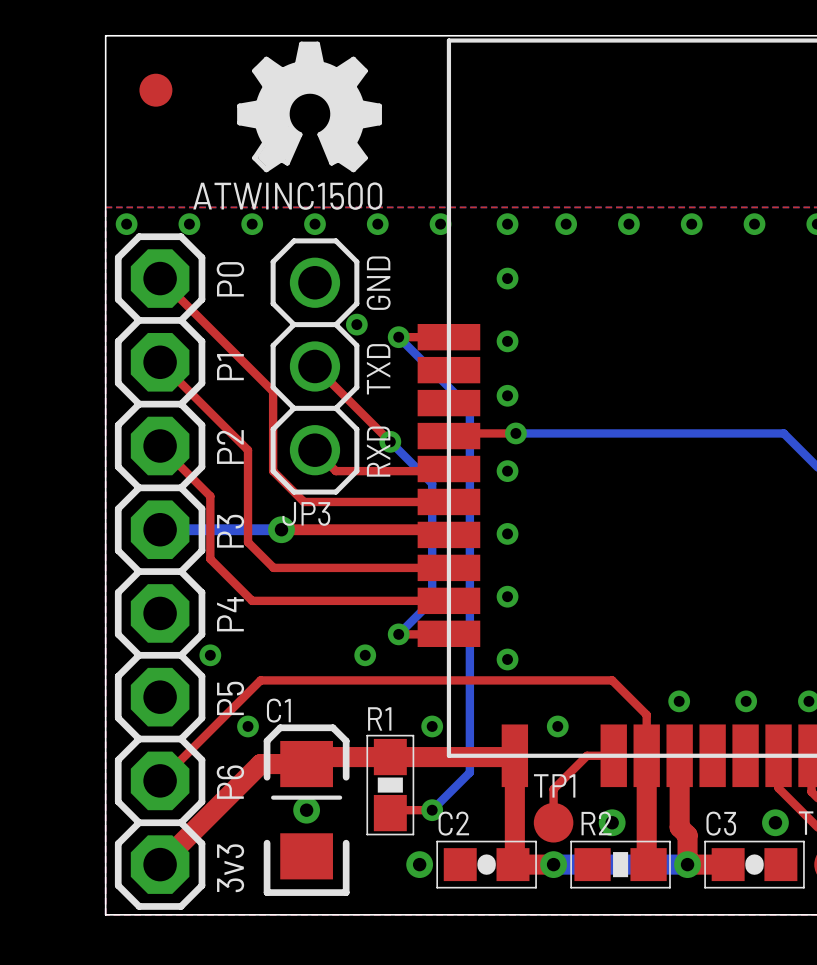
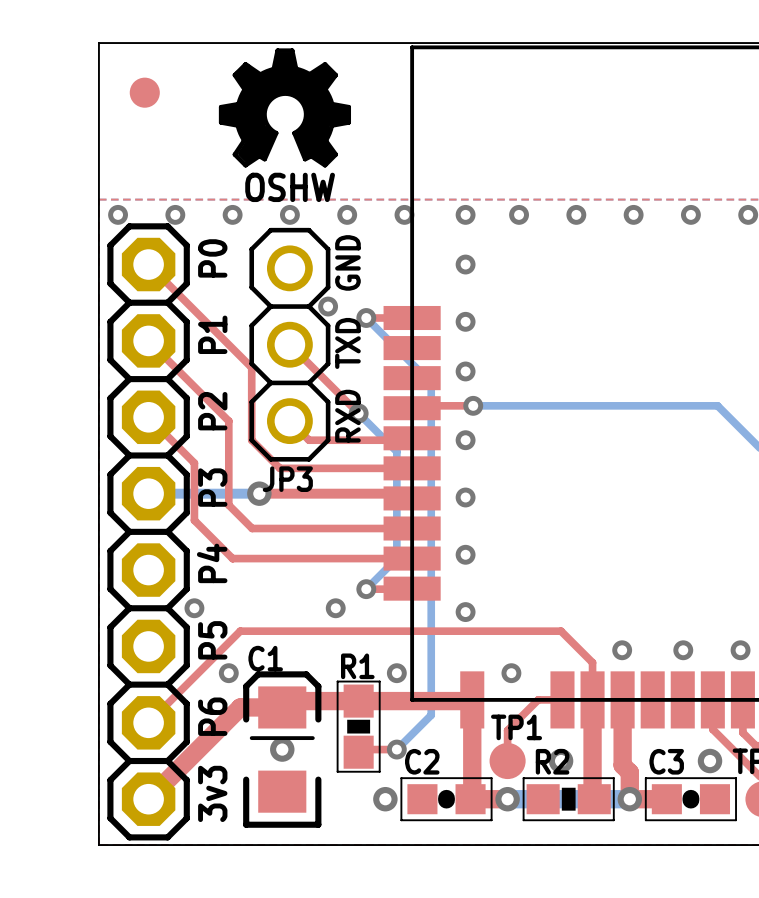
text: none -> OSHW (290, 187)
text: ATWINC1500 (287, 196) -> none

